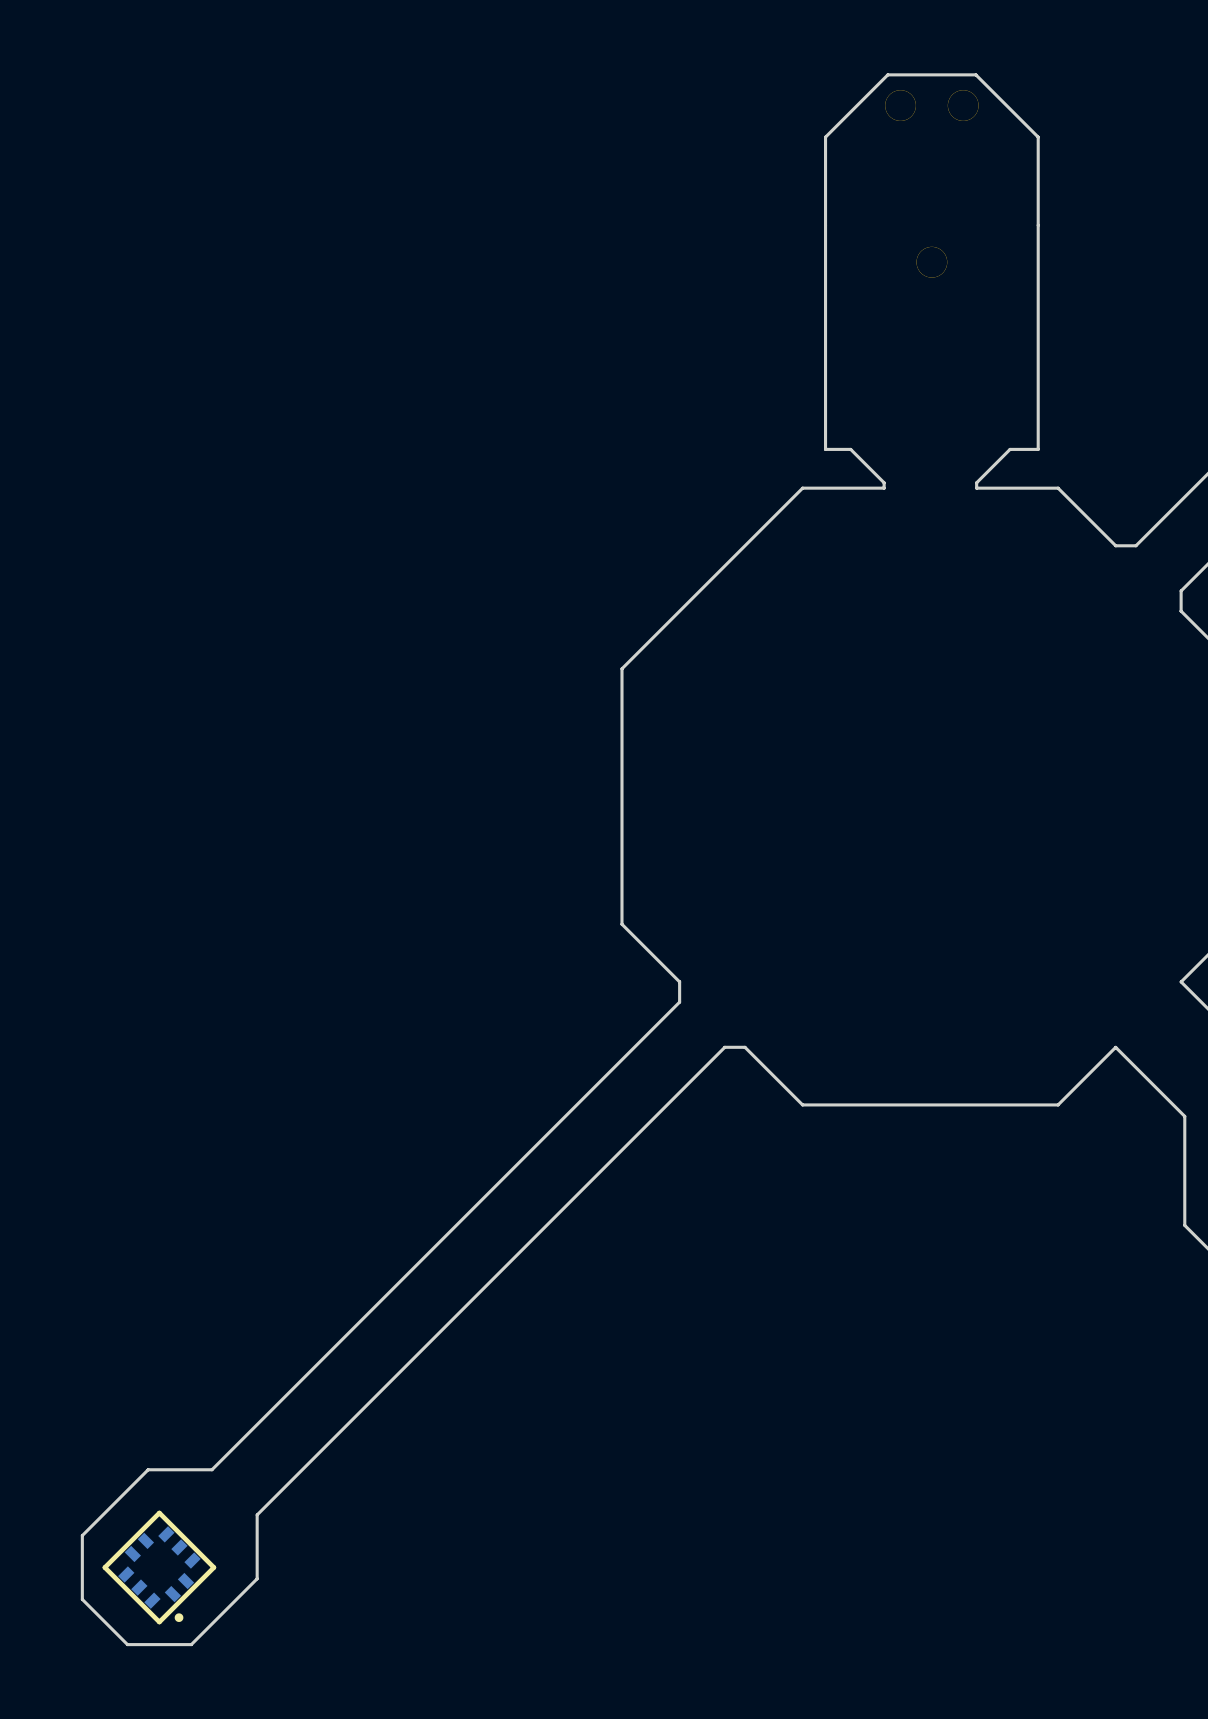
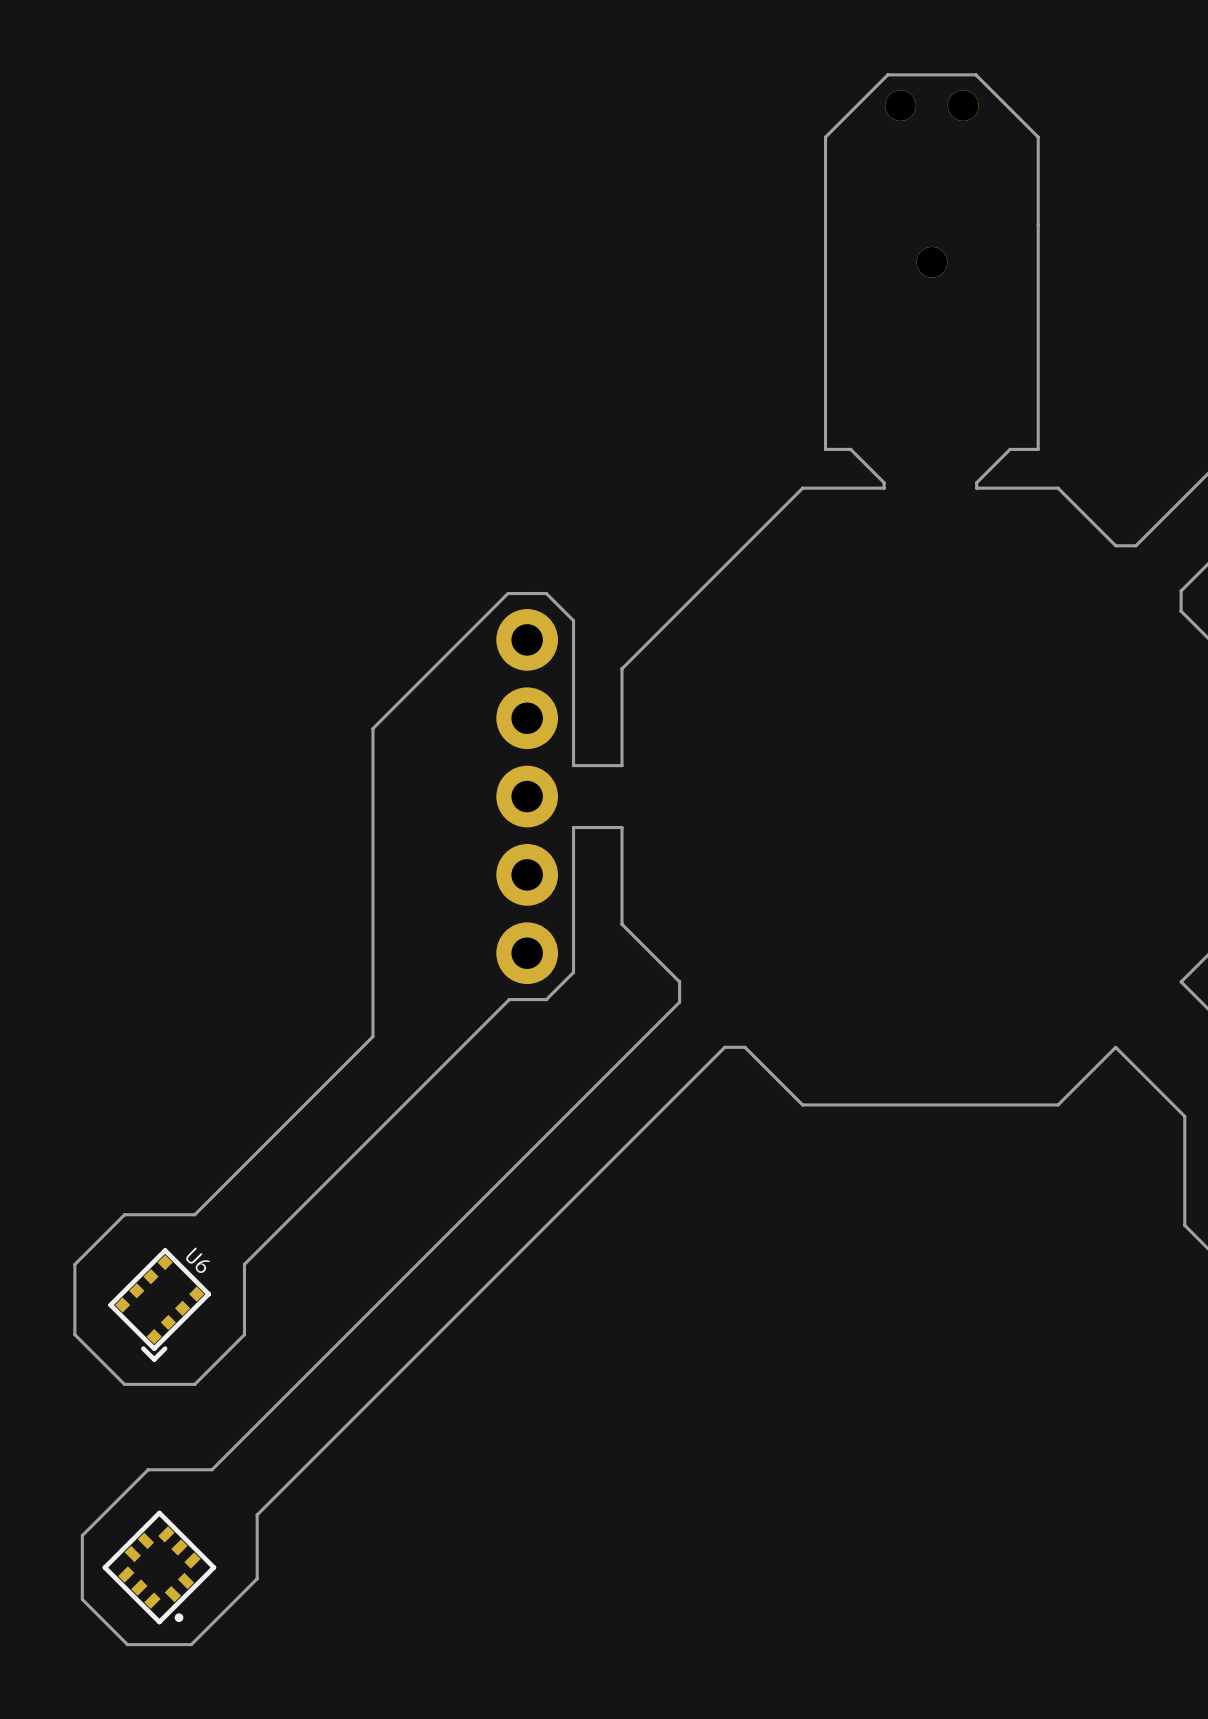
board edge: (621, 765) (621, 827) -> (621, 765) (573, 765) (573, 620) (546, 593) (507, 593) (372, 728) (372, 1036) (194, 1214) (124, 1214) (74, 1264) (74, 1334) (124, 1384) (194, 1384) (244, 1334) (244, 1264) (509, 999) (546, 999) (573, 972) (573, 827) (621, 827)
part: none -> (527, 796)
U6: none -> (159, 1305)

